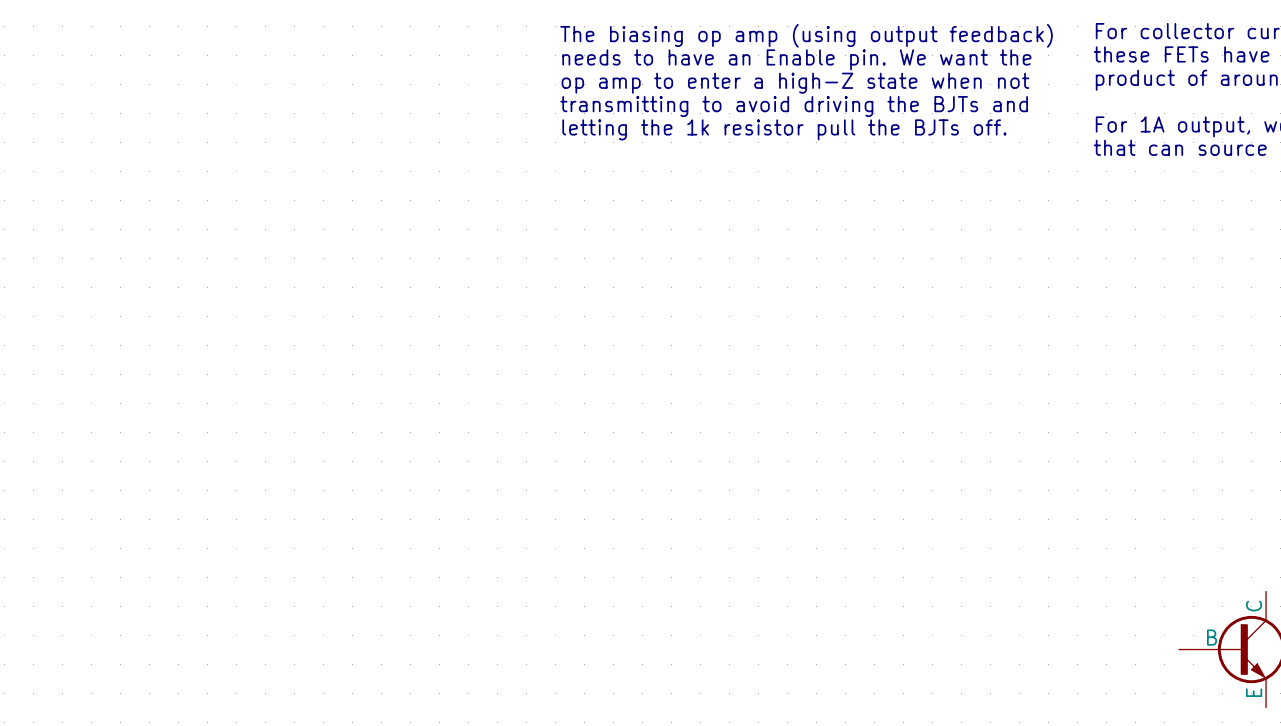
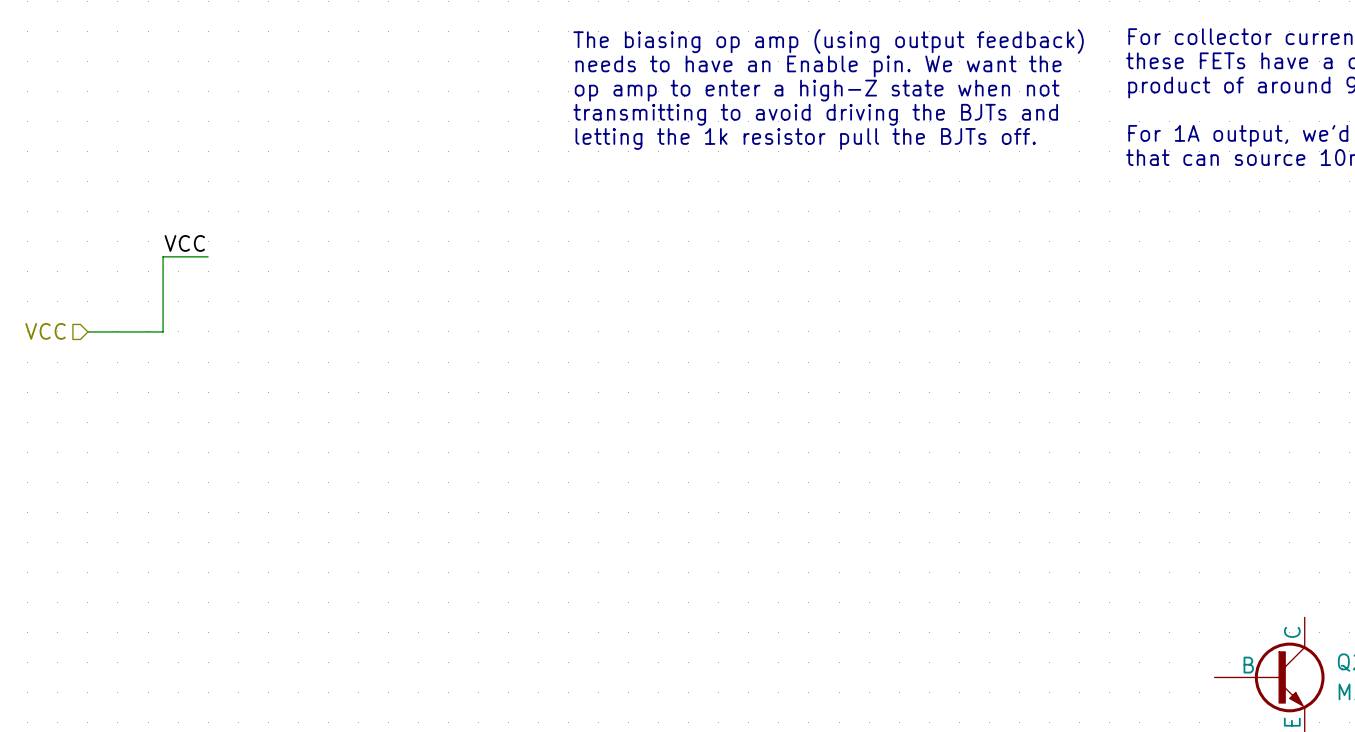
label: none -> VCC (184, 243)
wire: none -> (208, 256) (163, 256) (163, 331) (87, 331)
hierarchical label: none -> VCC (45, 331)

